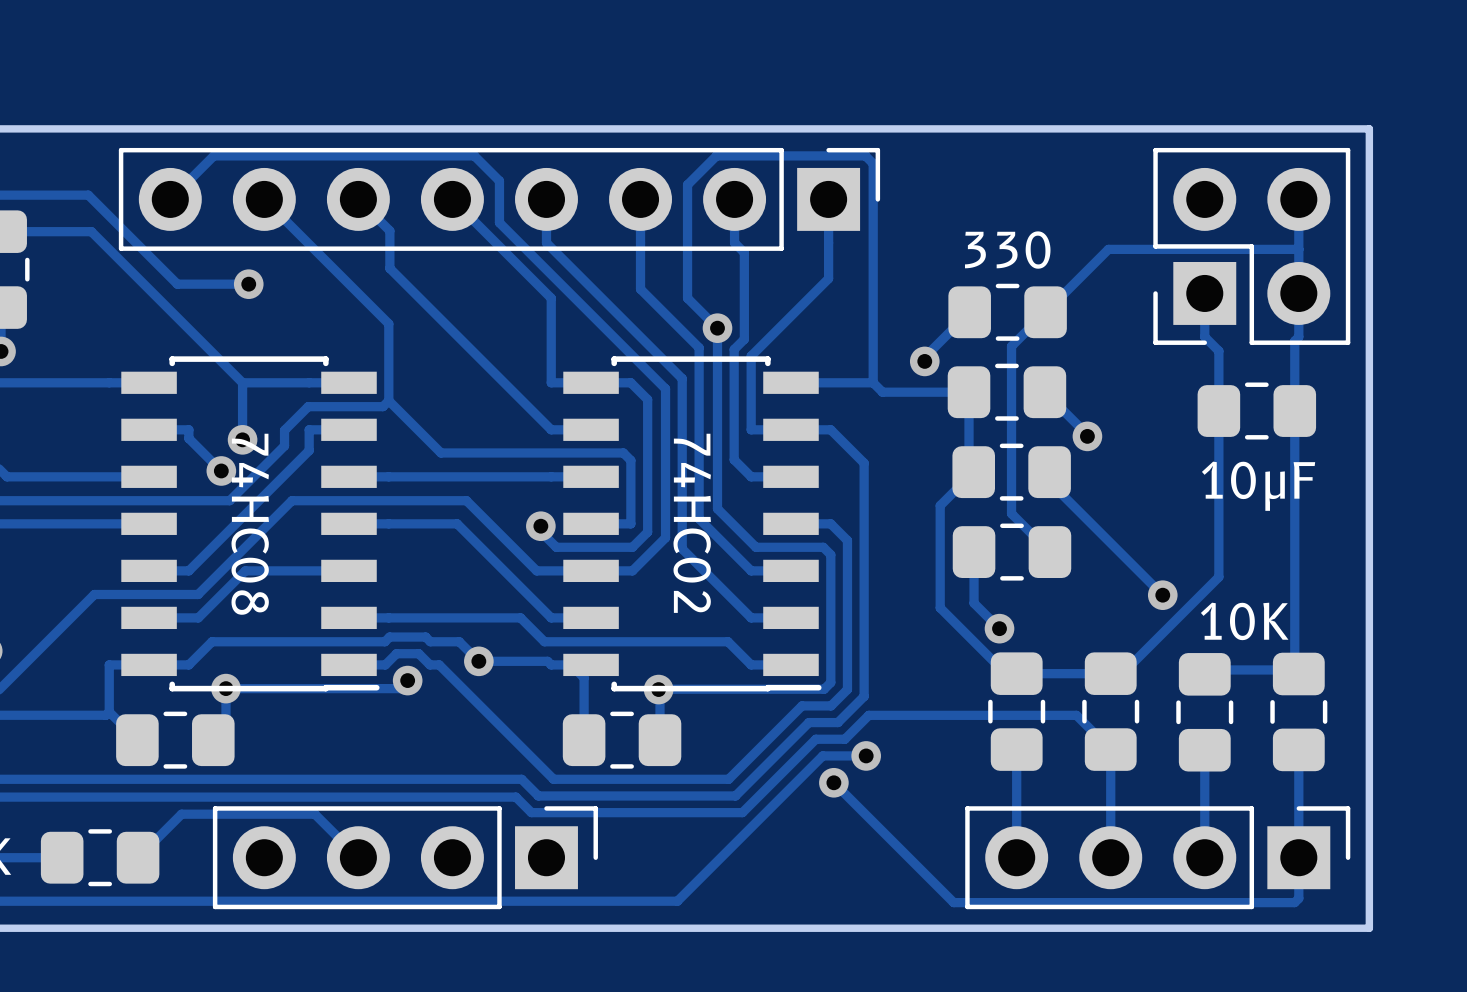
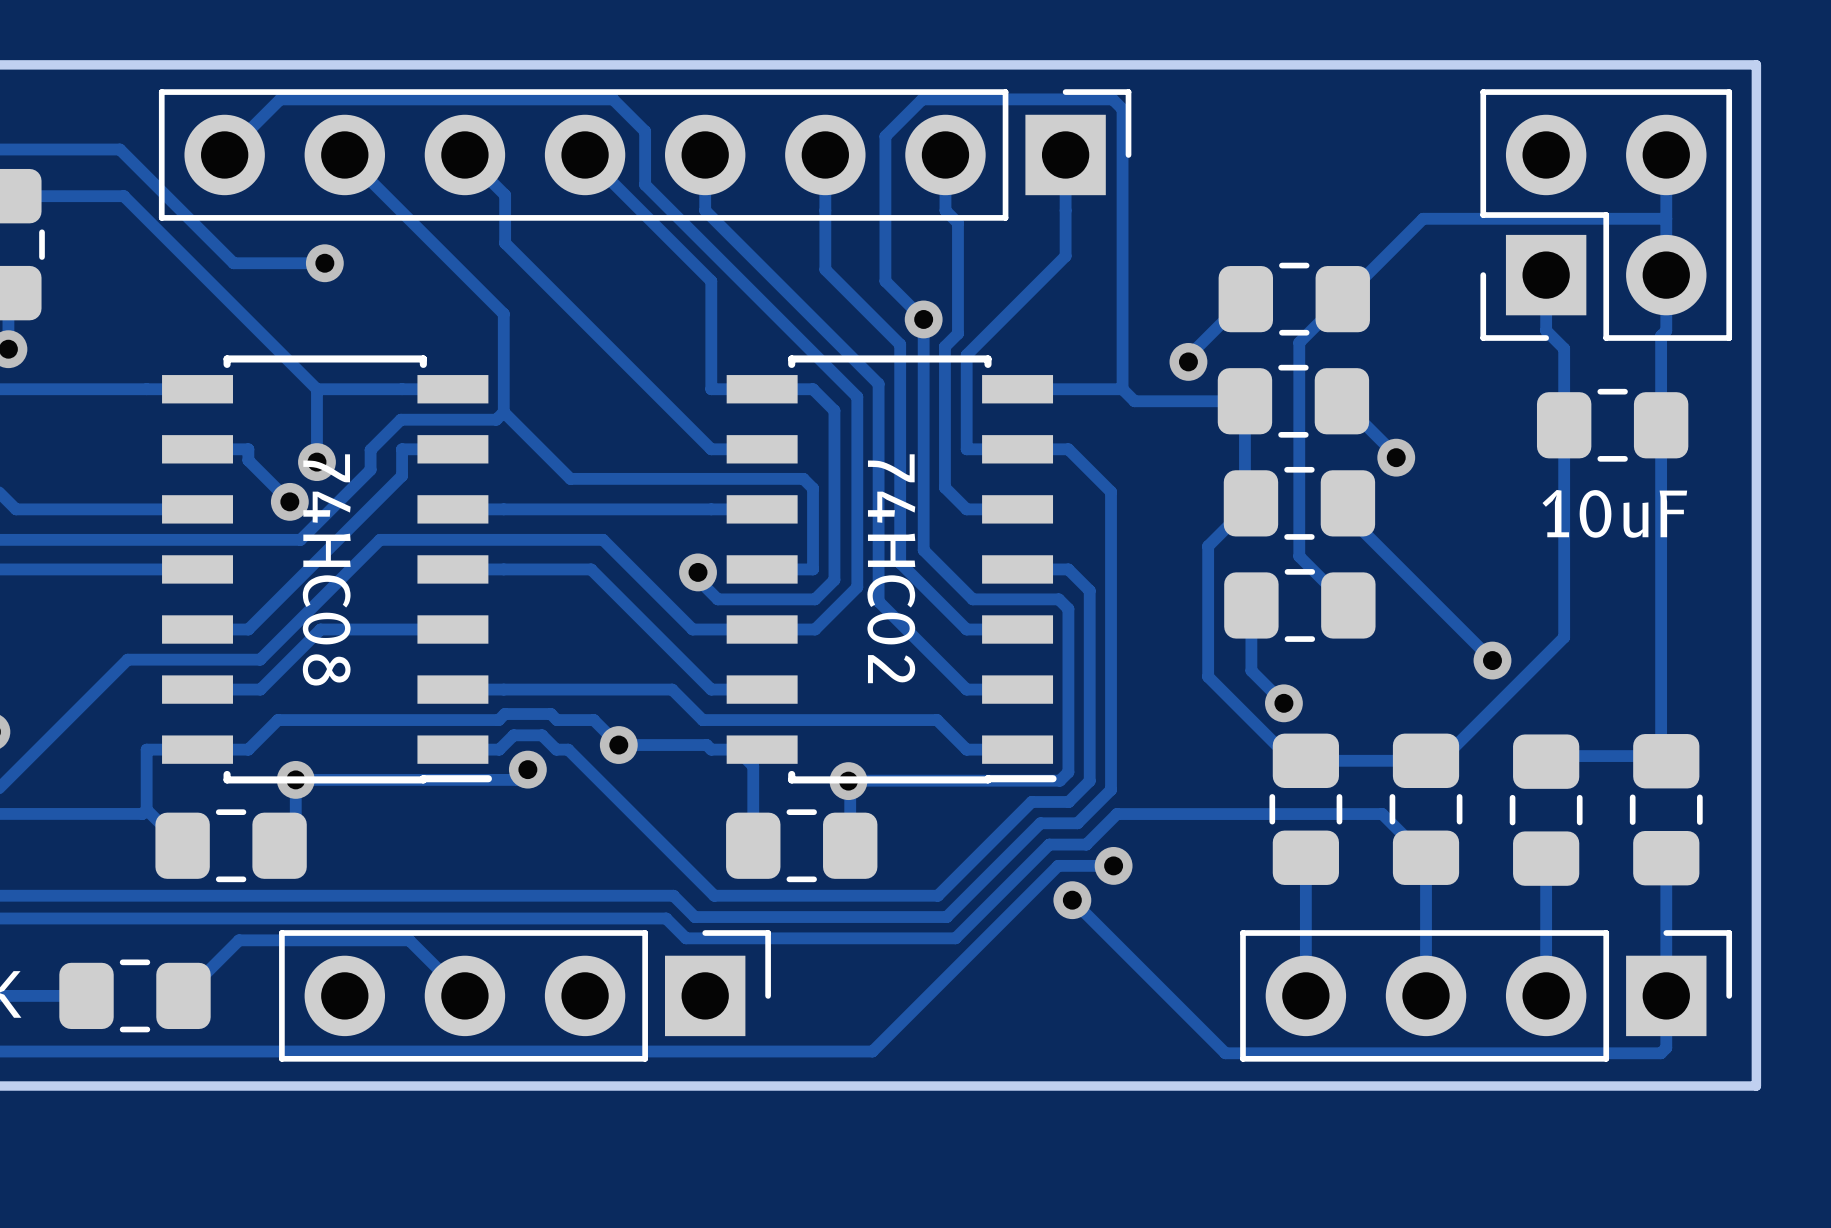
part value: 330 (1007, 250) -> none
part value: 10μF (1258, 486) -> 10uF (1614, 513)
part value: 10K (1244, 621) -> none

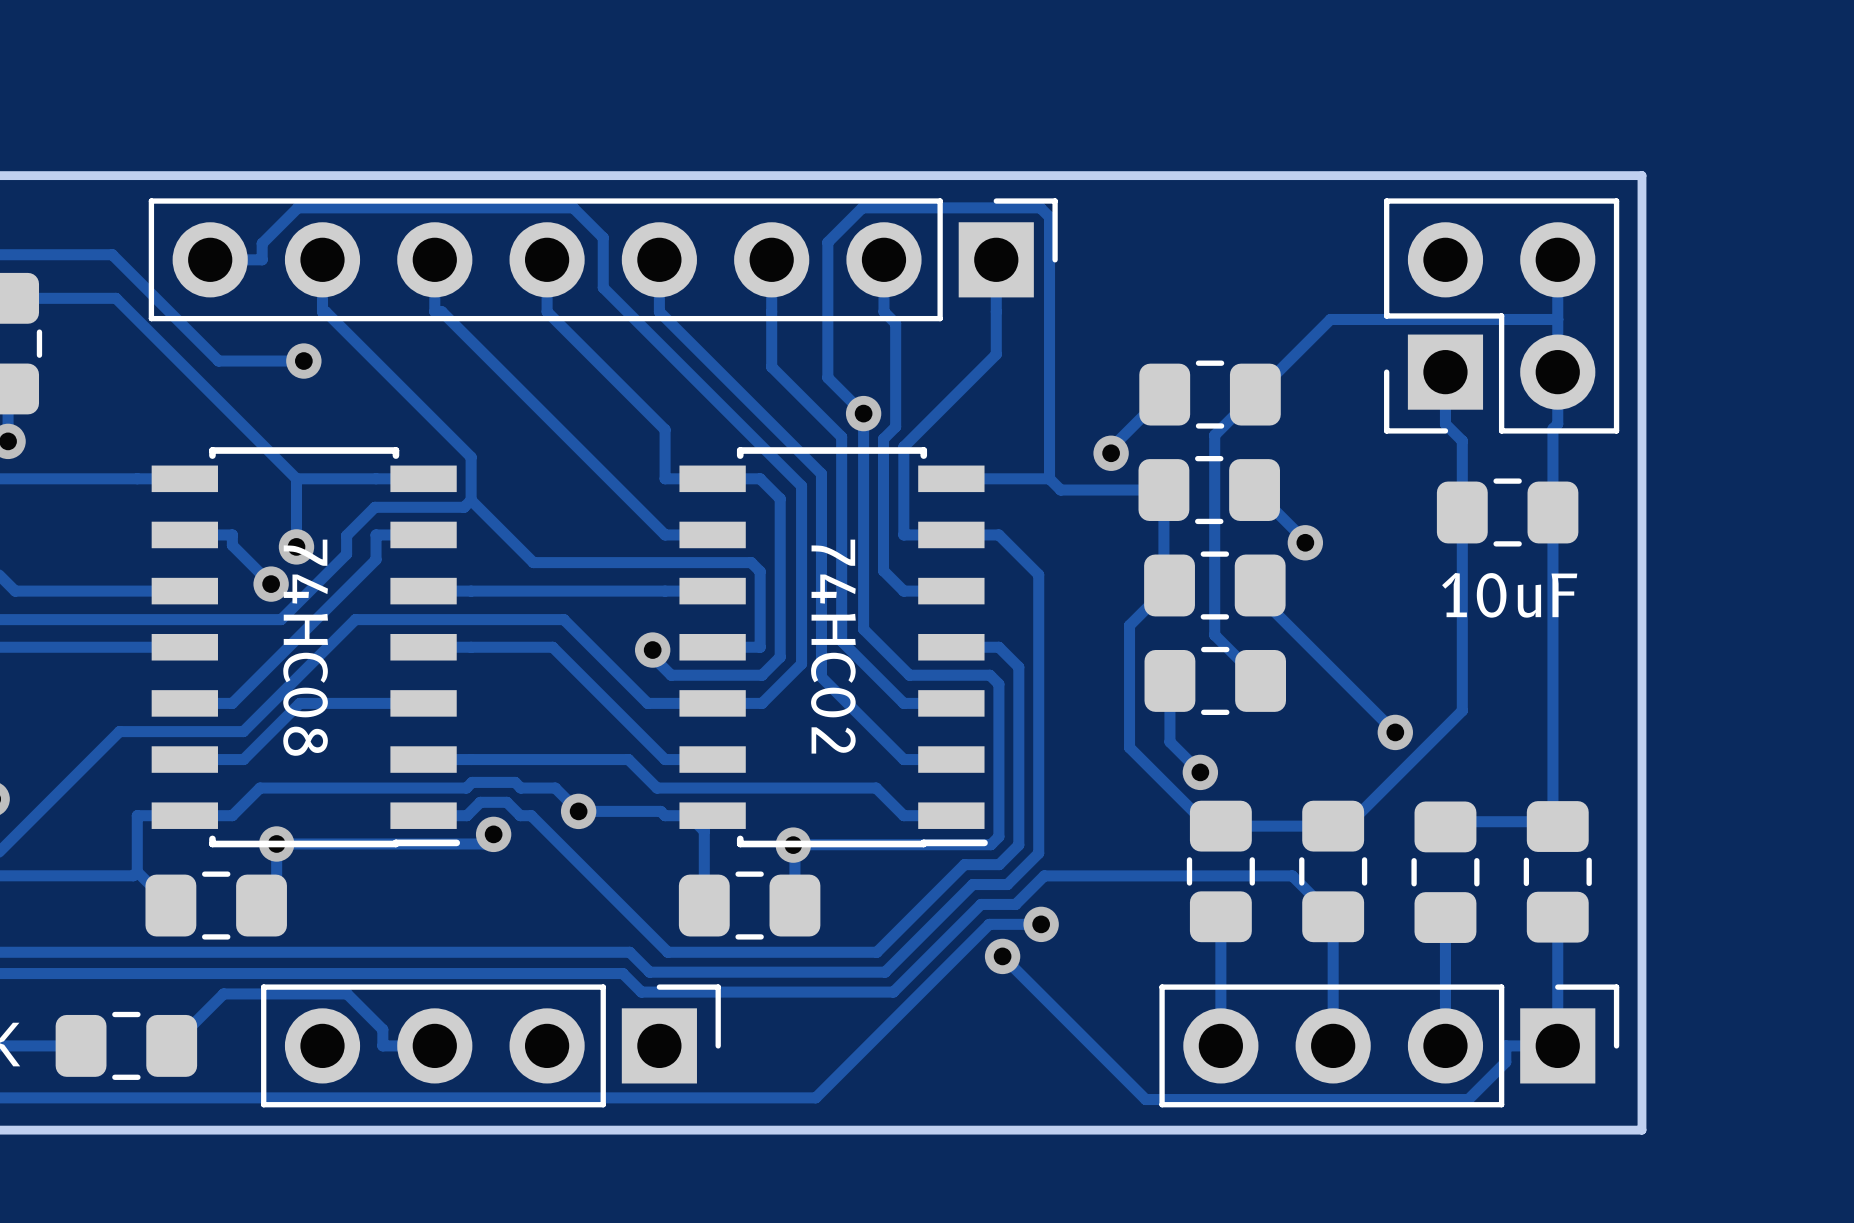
track: (318, 99) (280, 99) (224, 154) -> (297, 207) (262, 243) (262, 259) (210, 259)
track: (344, 154) (503, 313) (503, 366) -> (322, 259) (322, 311) (325, 311) (471, 457)
track: (464, 154) (505, 195) (505, 243) -> (434, 259) (434, 311) (441, 311) (472, 342)
track: (585, 154) (711, 281) (711, 336) -> (547, 259) (547, 311) (665, 429)
track: (371, 940) (409, 940) (464, 995) -> (347, 993) (382, 1029) (382, 1045) (434, 1045)
track: (1666, 995) (1666, 1047) (1660, 1053) (1570, 1053) -> (1557, 1045) (1505, 1045) (1505, 1062) (1468, 1099)

